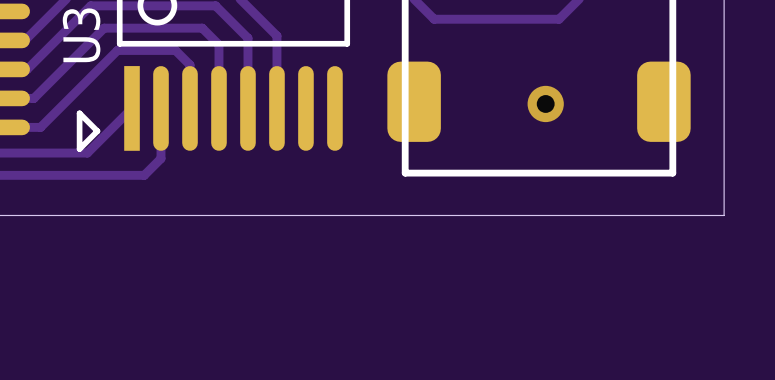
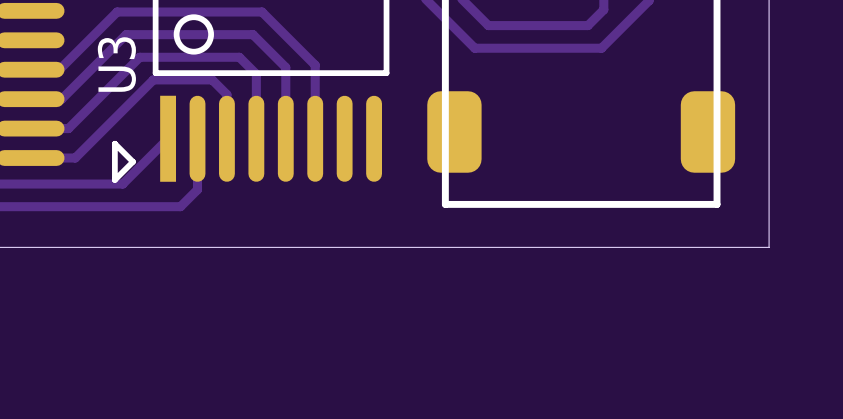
via: (545, 103) -> none

